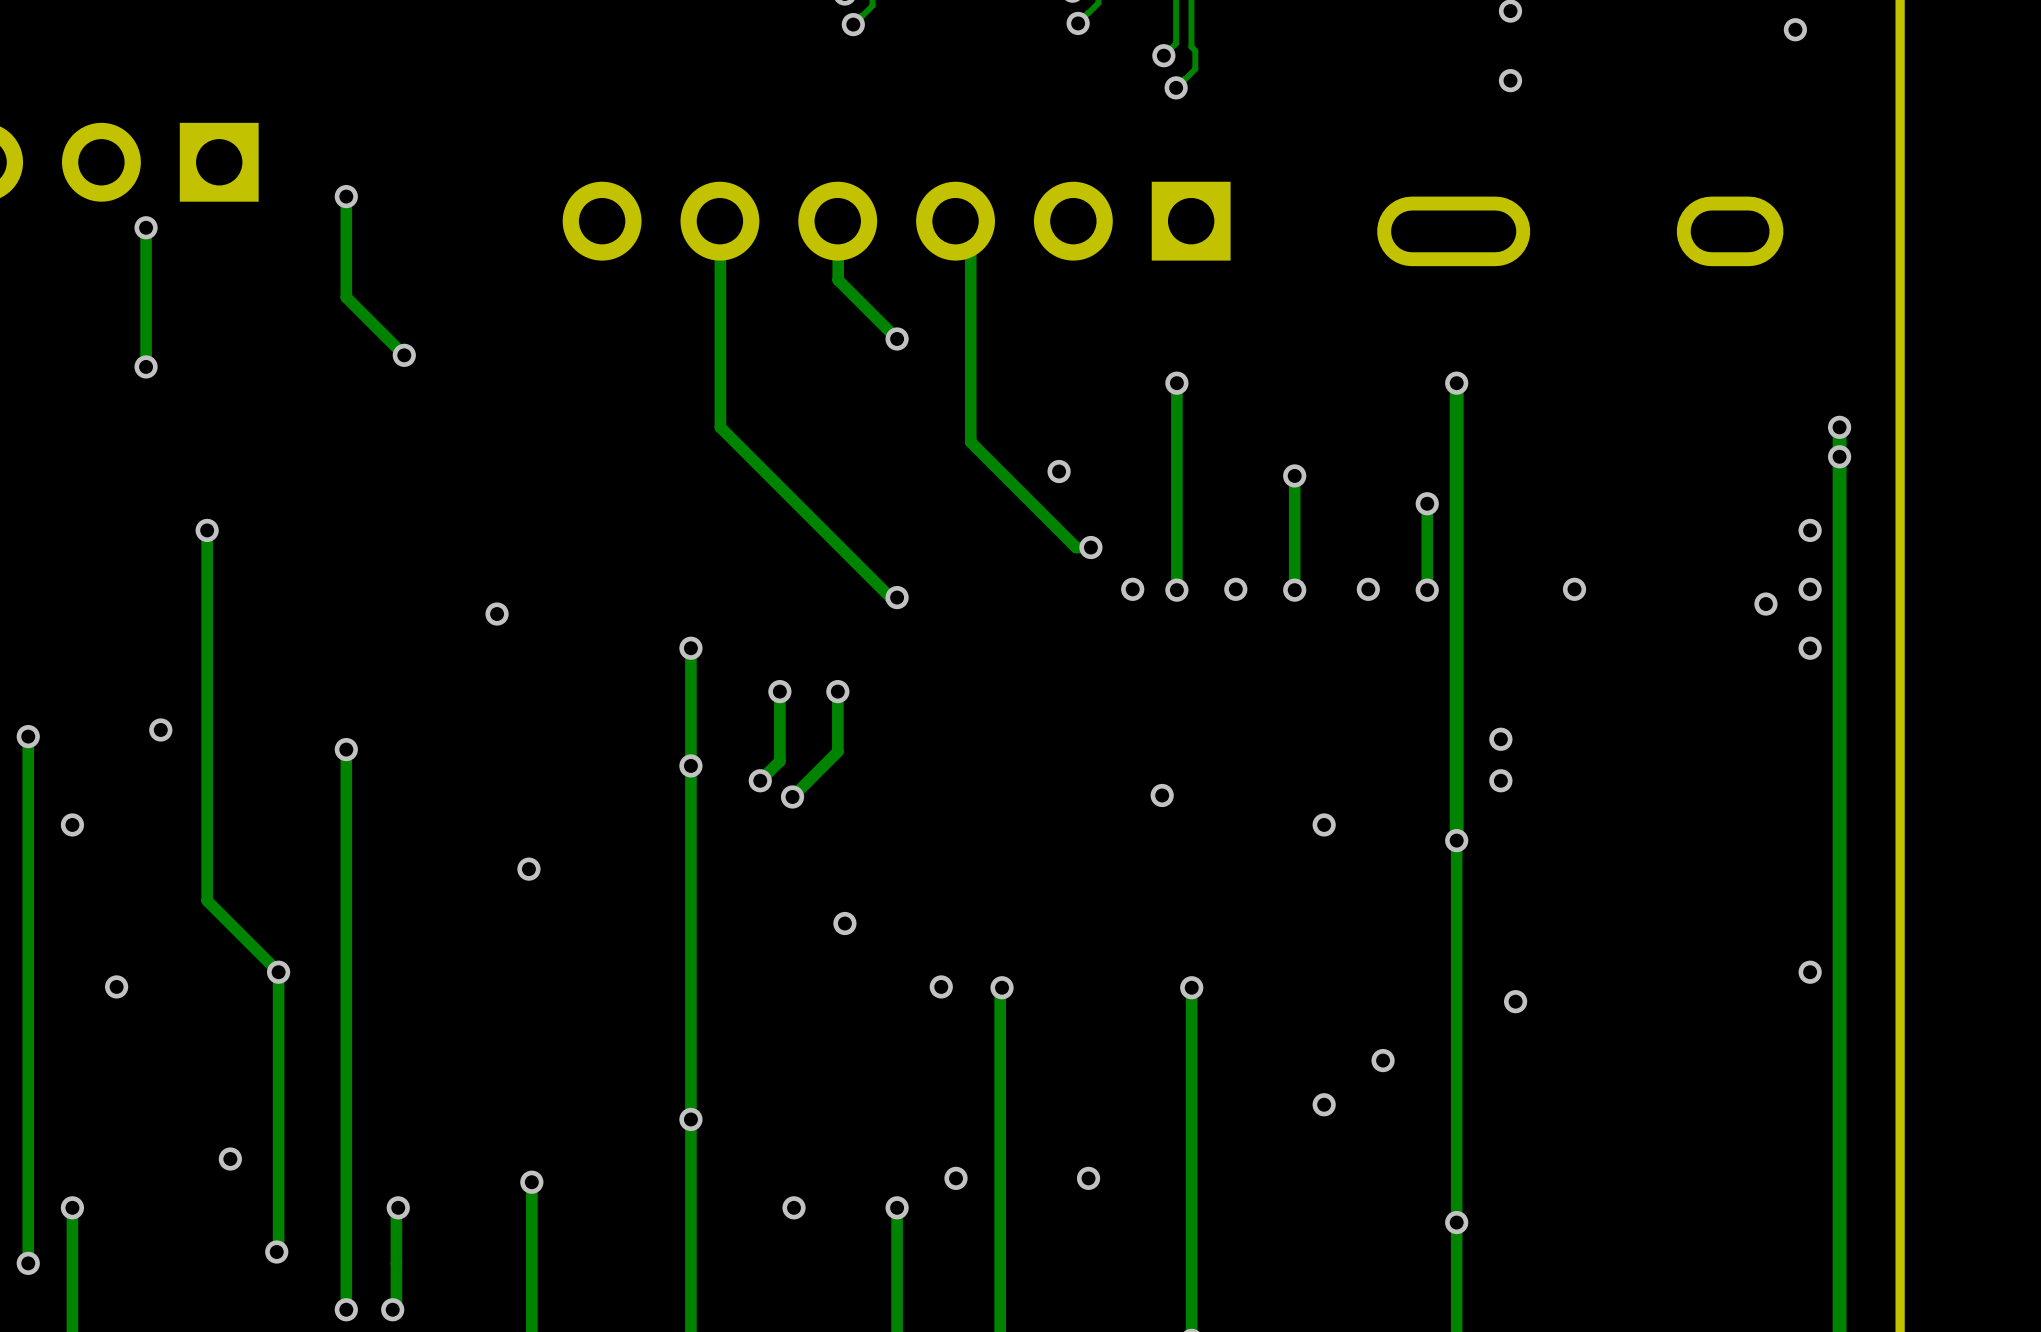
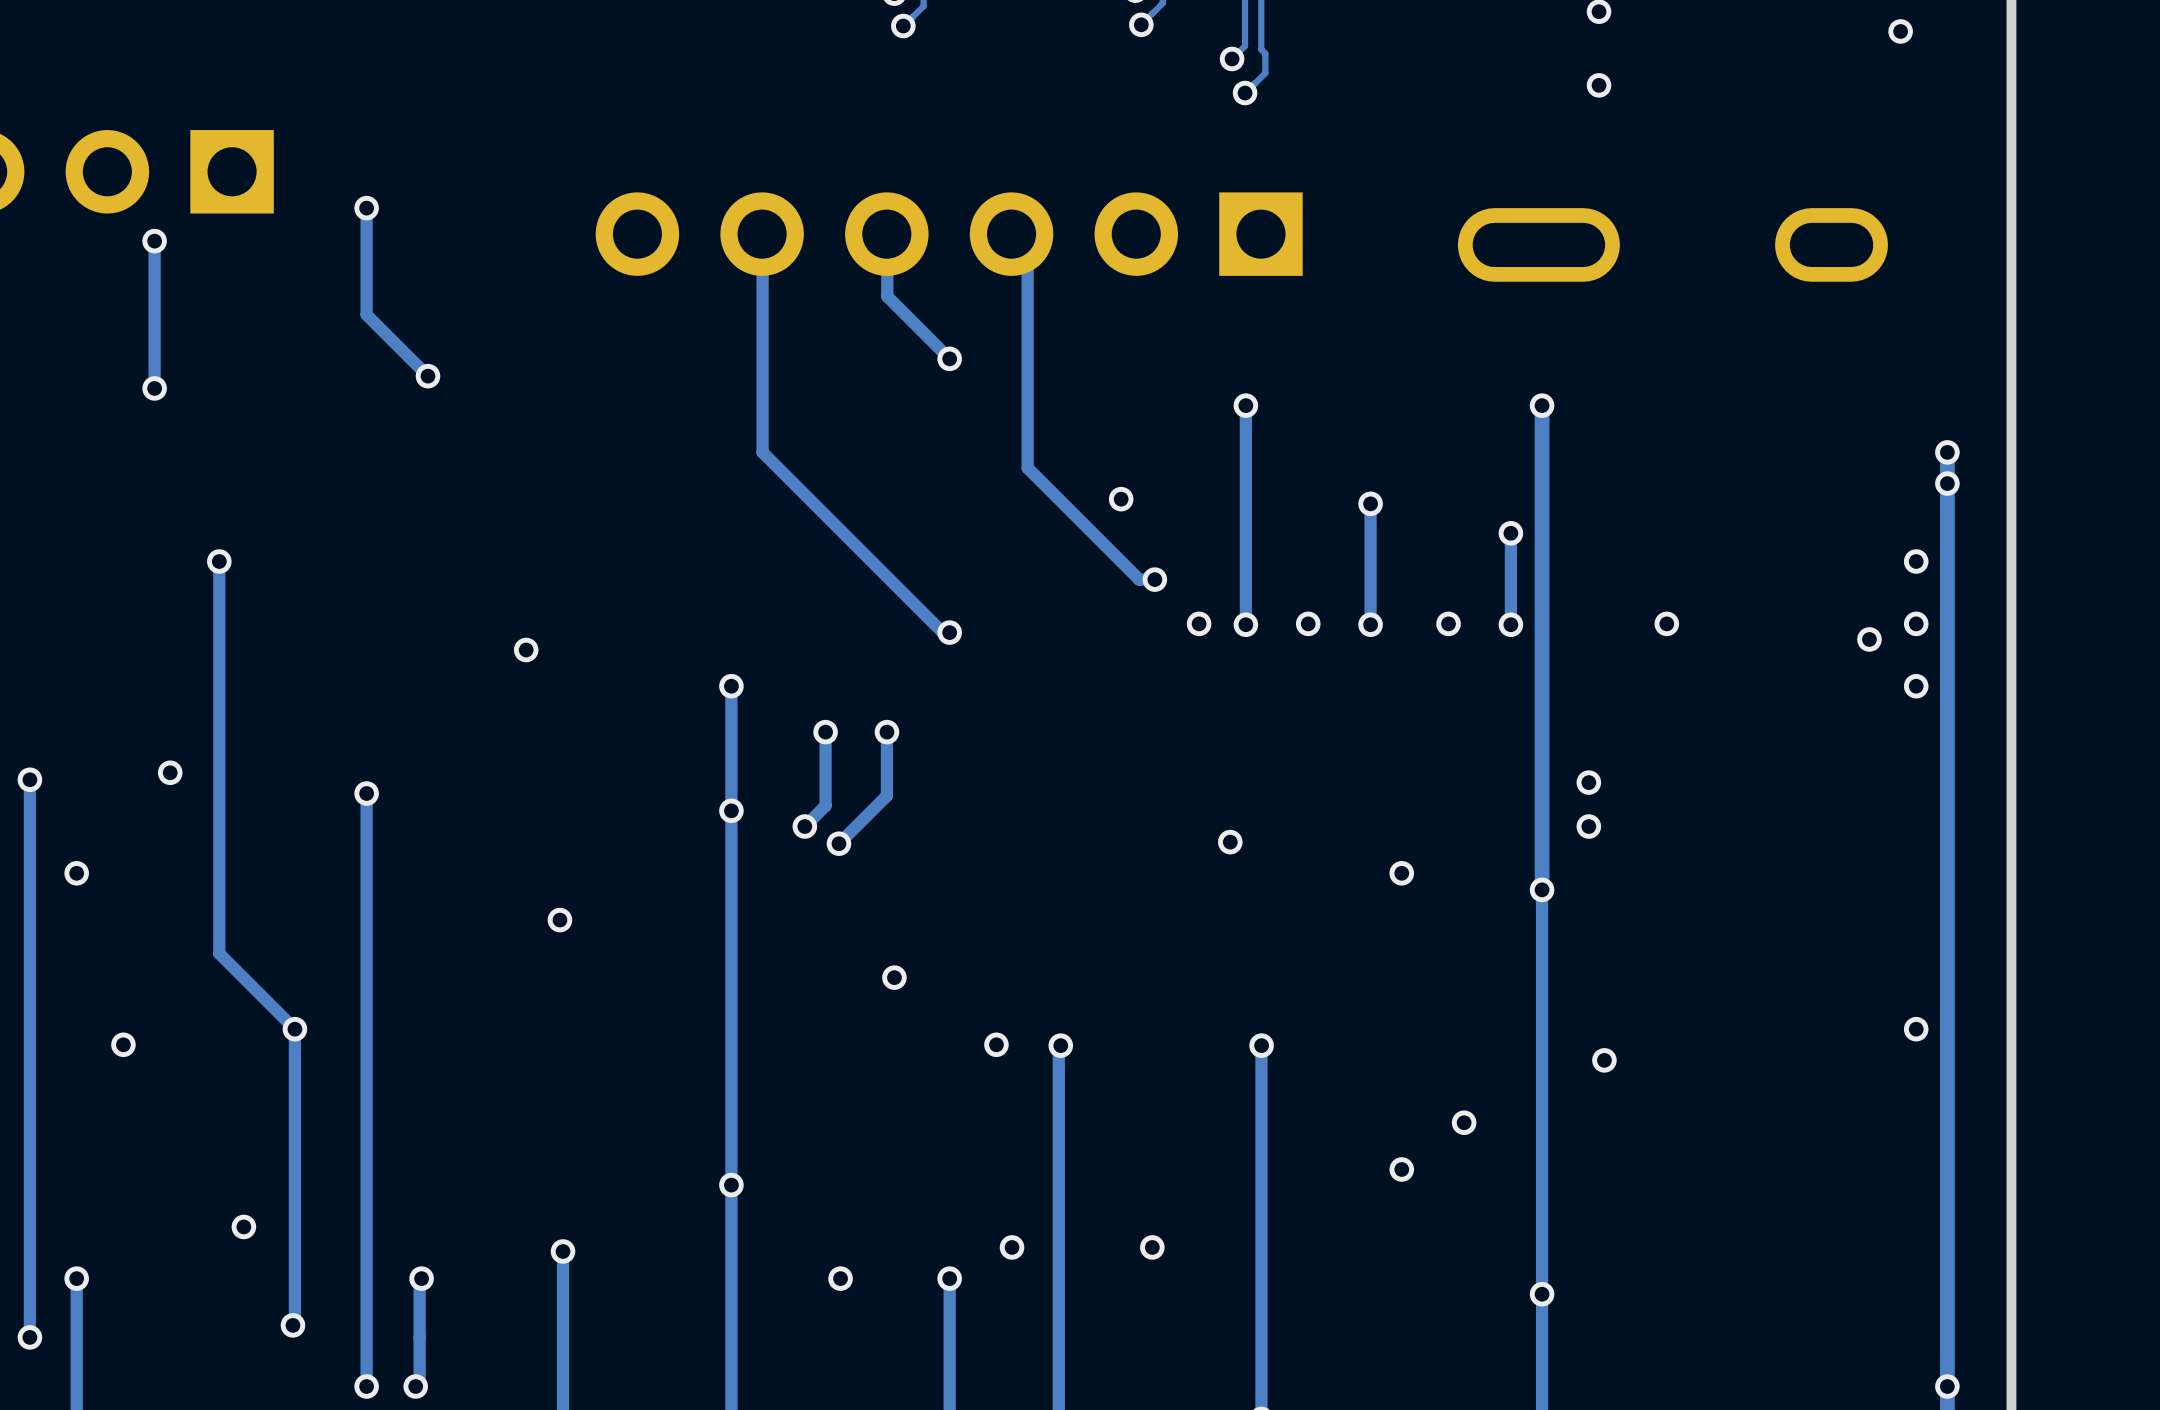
via: none -> (1947, 1386)

